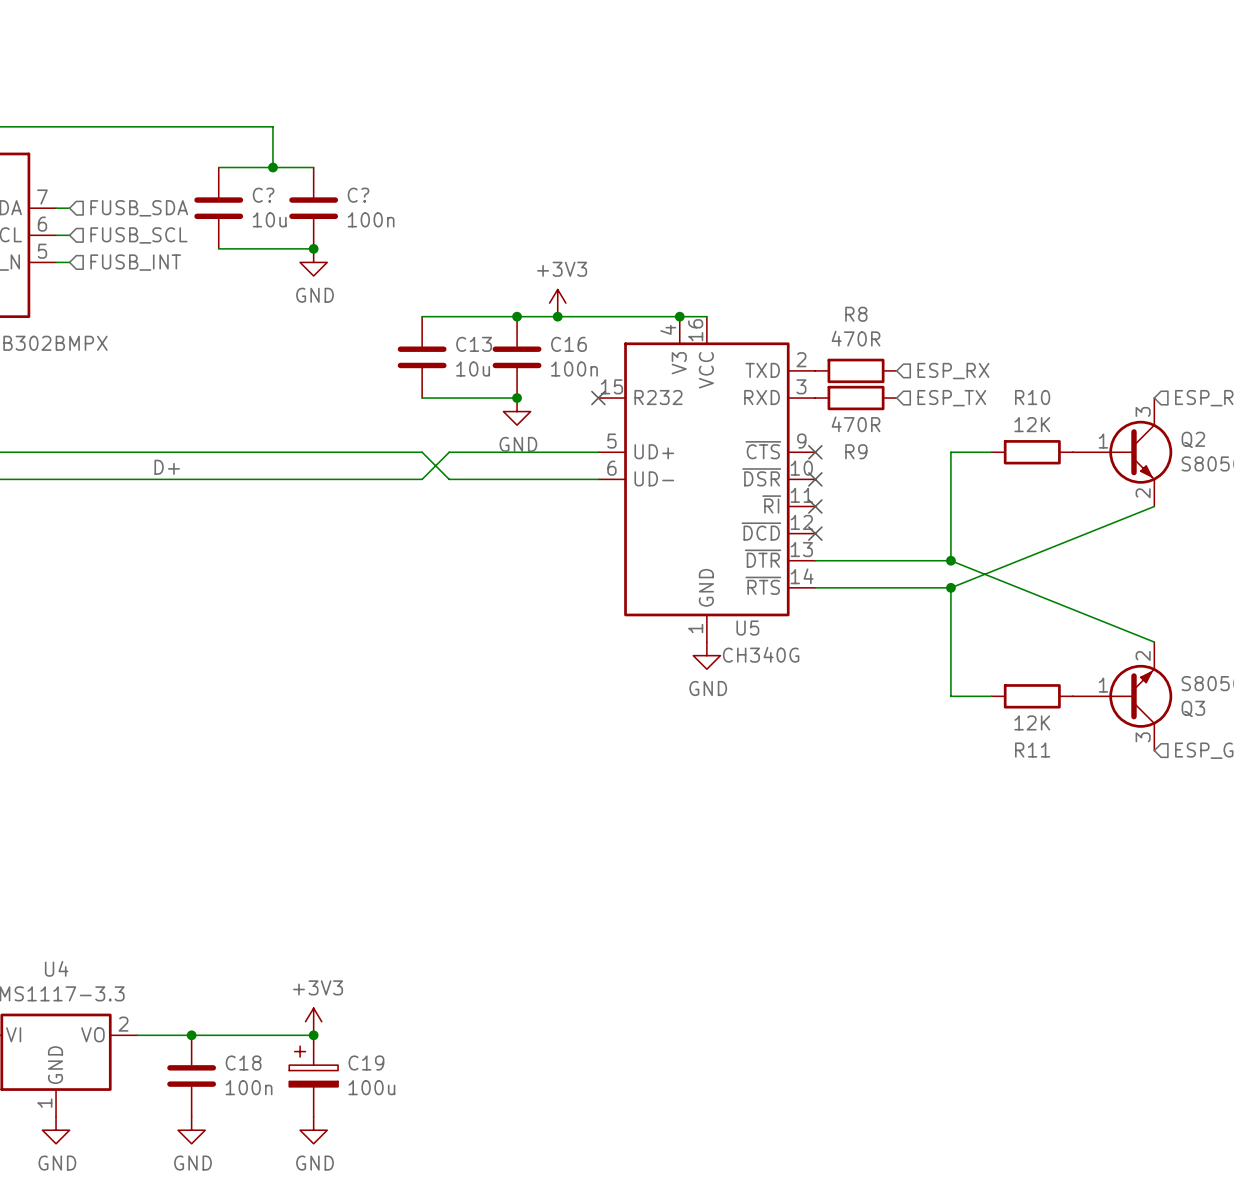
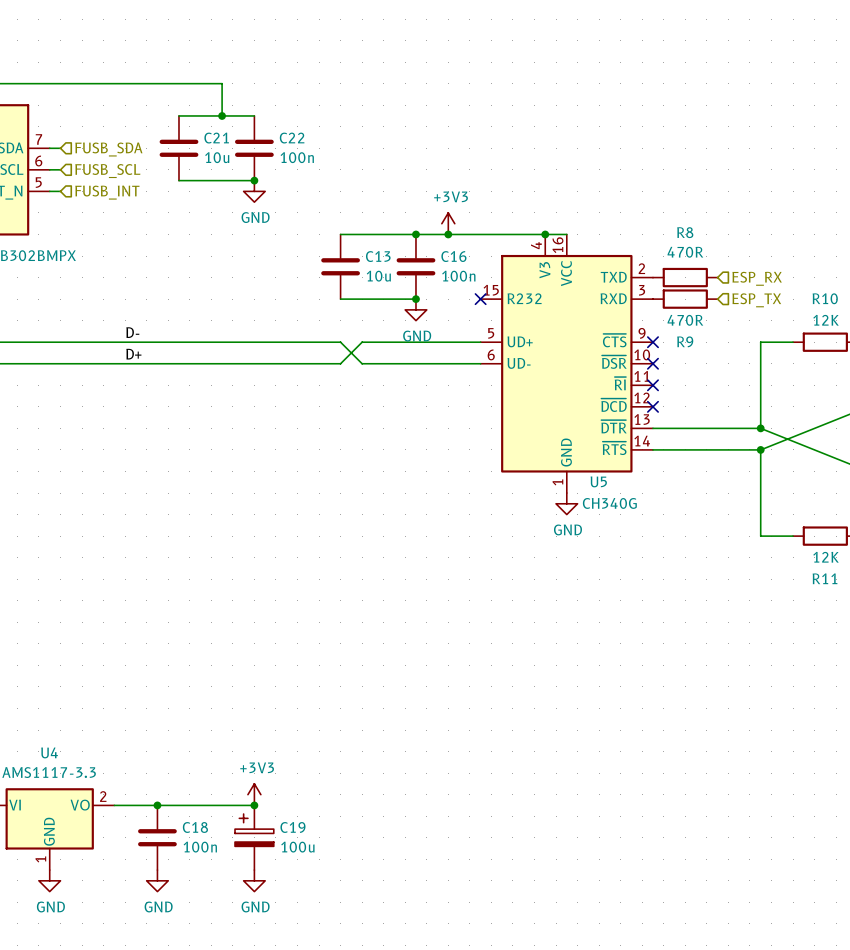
C? name: C? (263, 195) -> C21 (216, 138)
C? name: C? (358, 195) -> C22 (292, 138)
label: none -> D- (132, 332)

